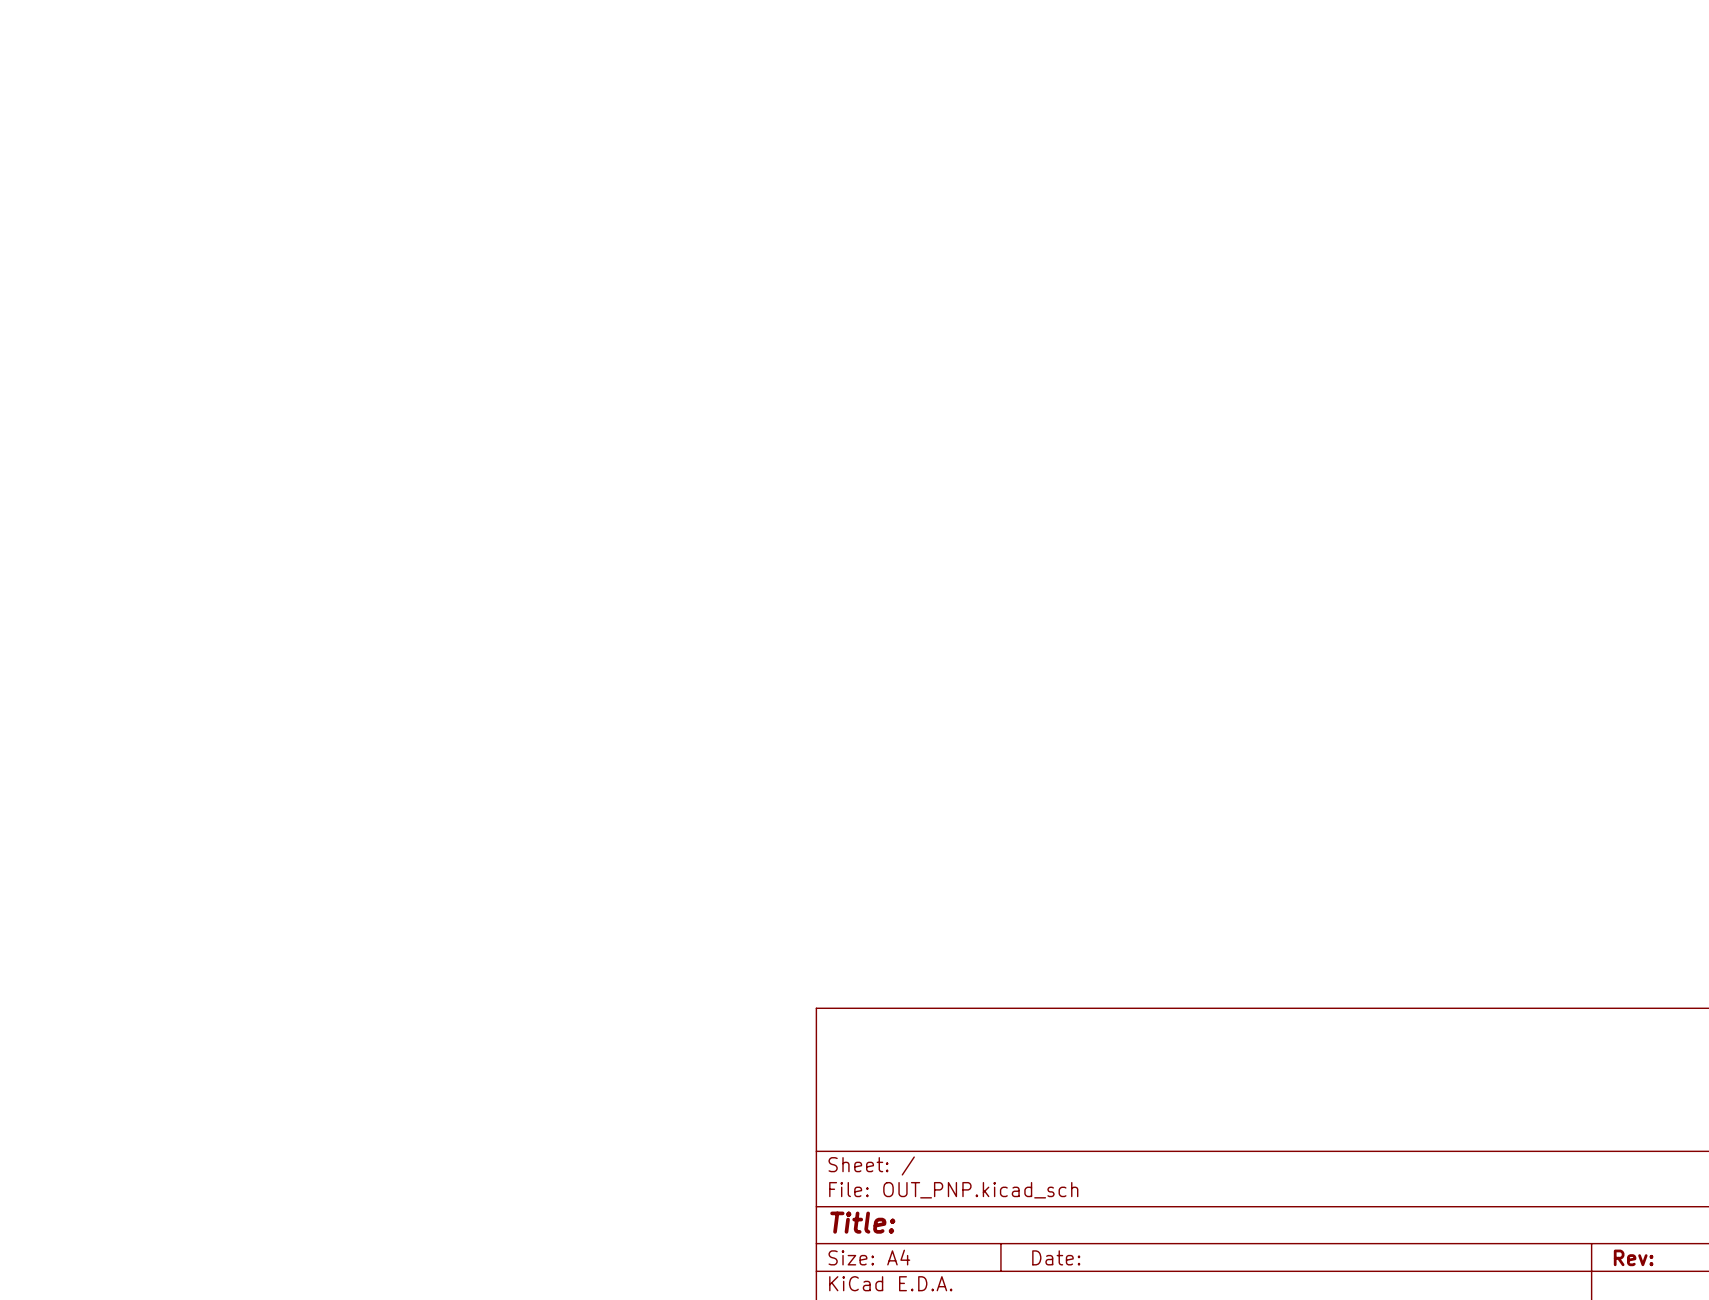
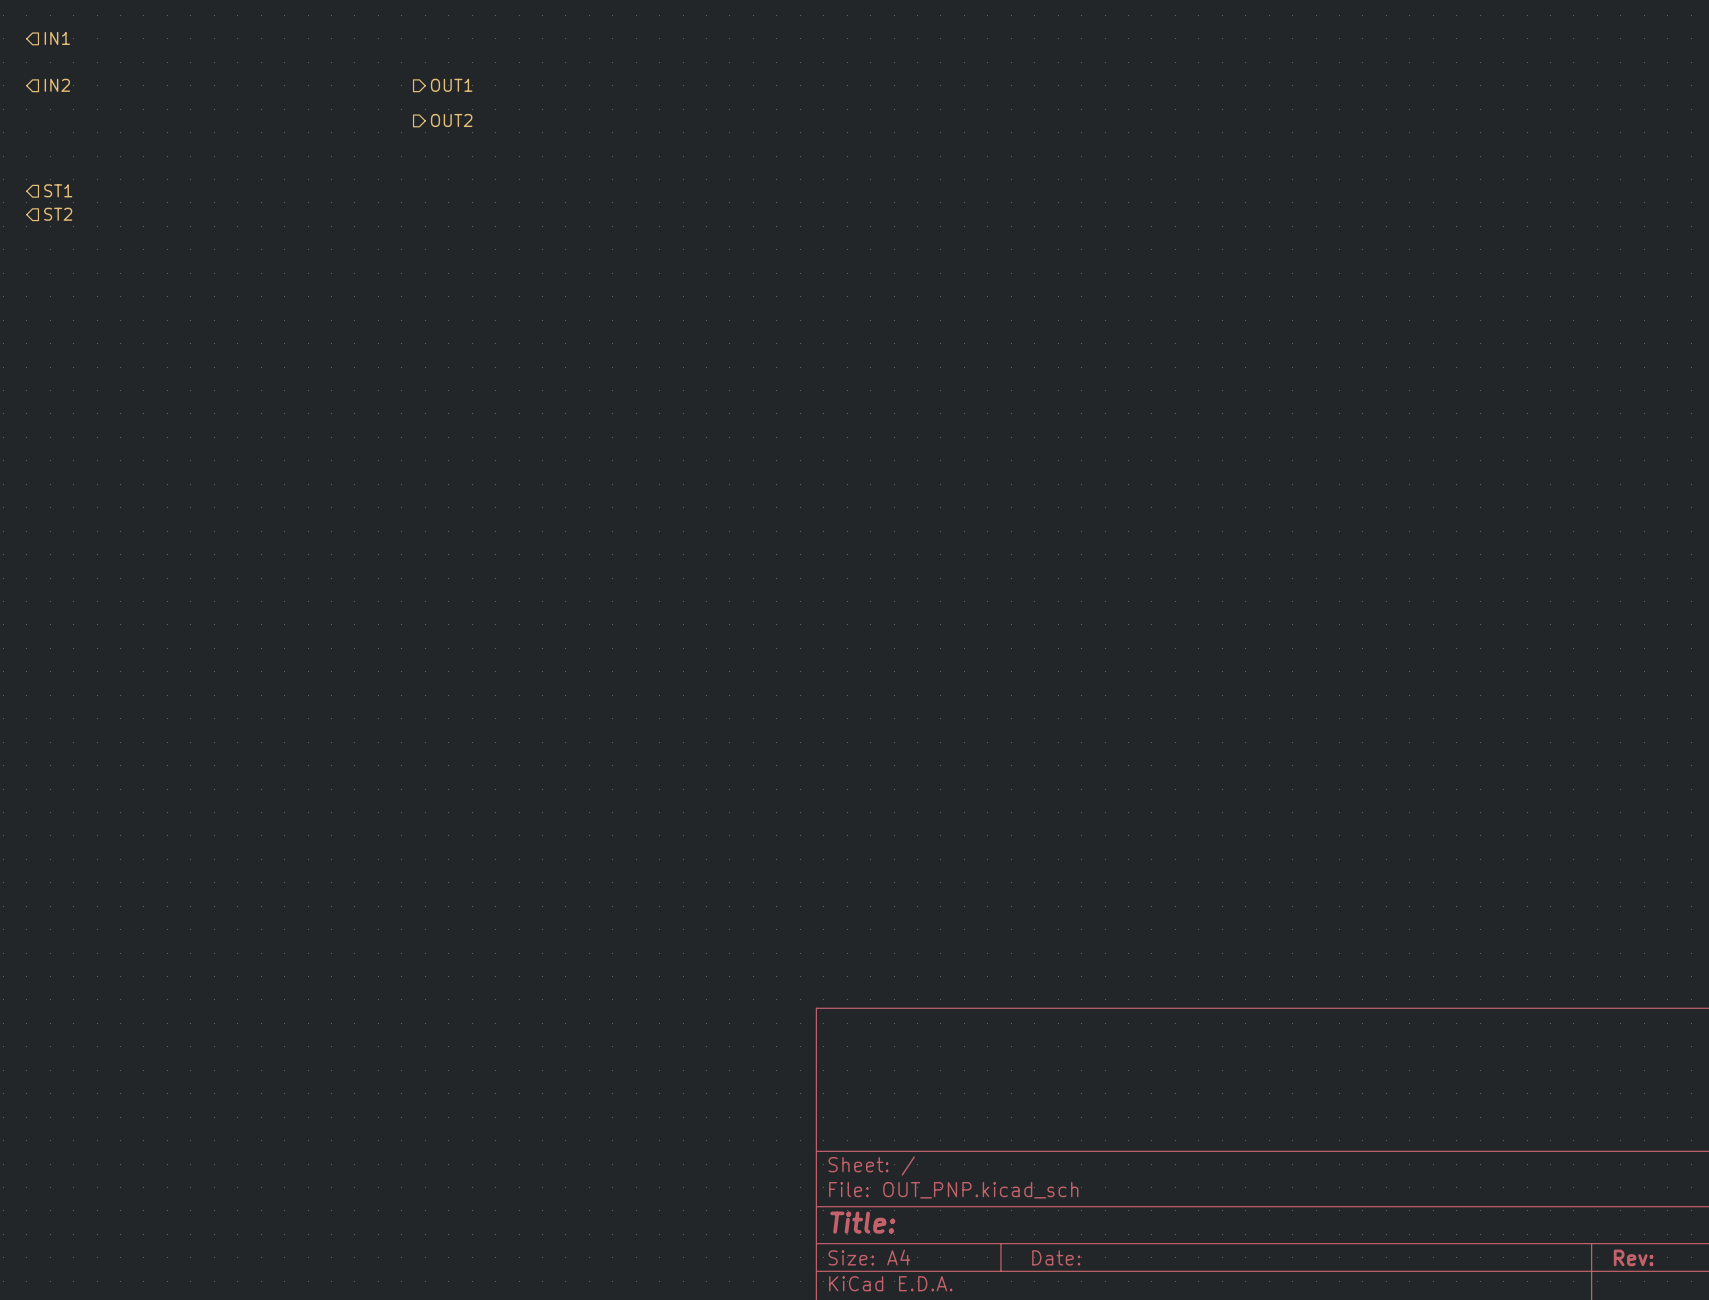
hierarchical label: none -> IN1 (57, 38)
hierarchical label: none -> IN2 (57, 85)
hierarchical label: none -> OUT1 (451, 85)
hierarchical label: none -> OUT2 (451, 120)
hierarchical label: none -> ST1 (58, 190)
hierarchical label: none -> ST2 (58, 214)

